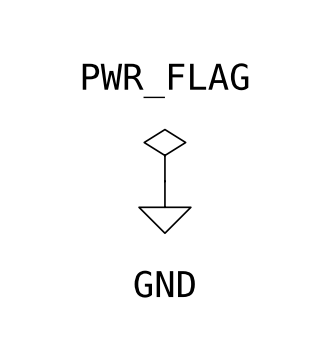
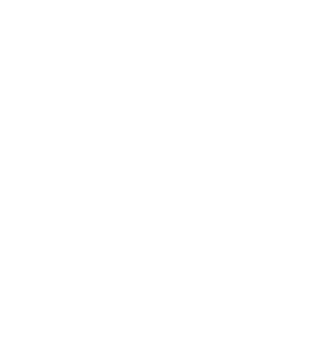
power symbol: PWR_FLAG (164, 155) -> none
power symbol: GND (164, 207) -> none

